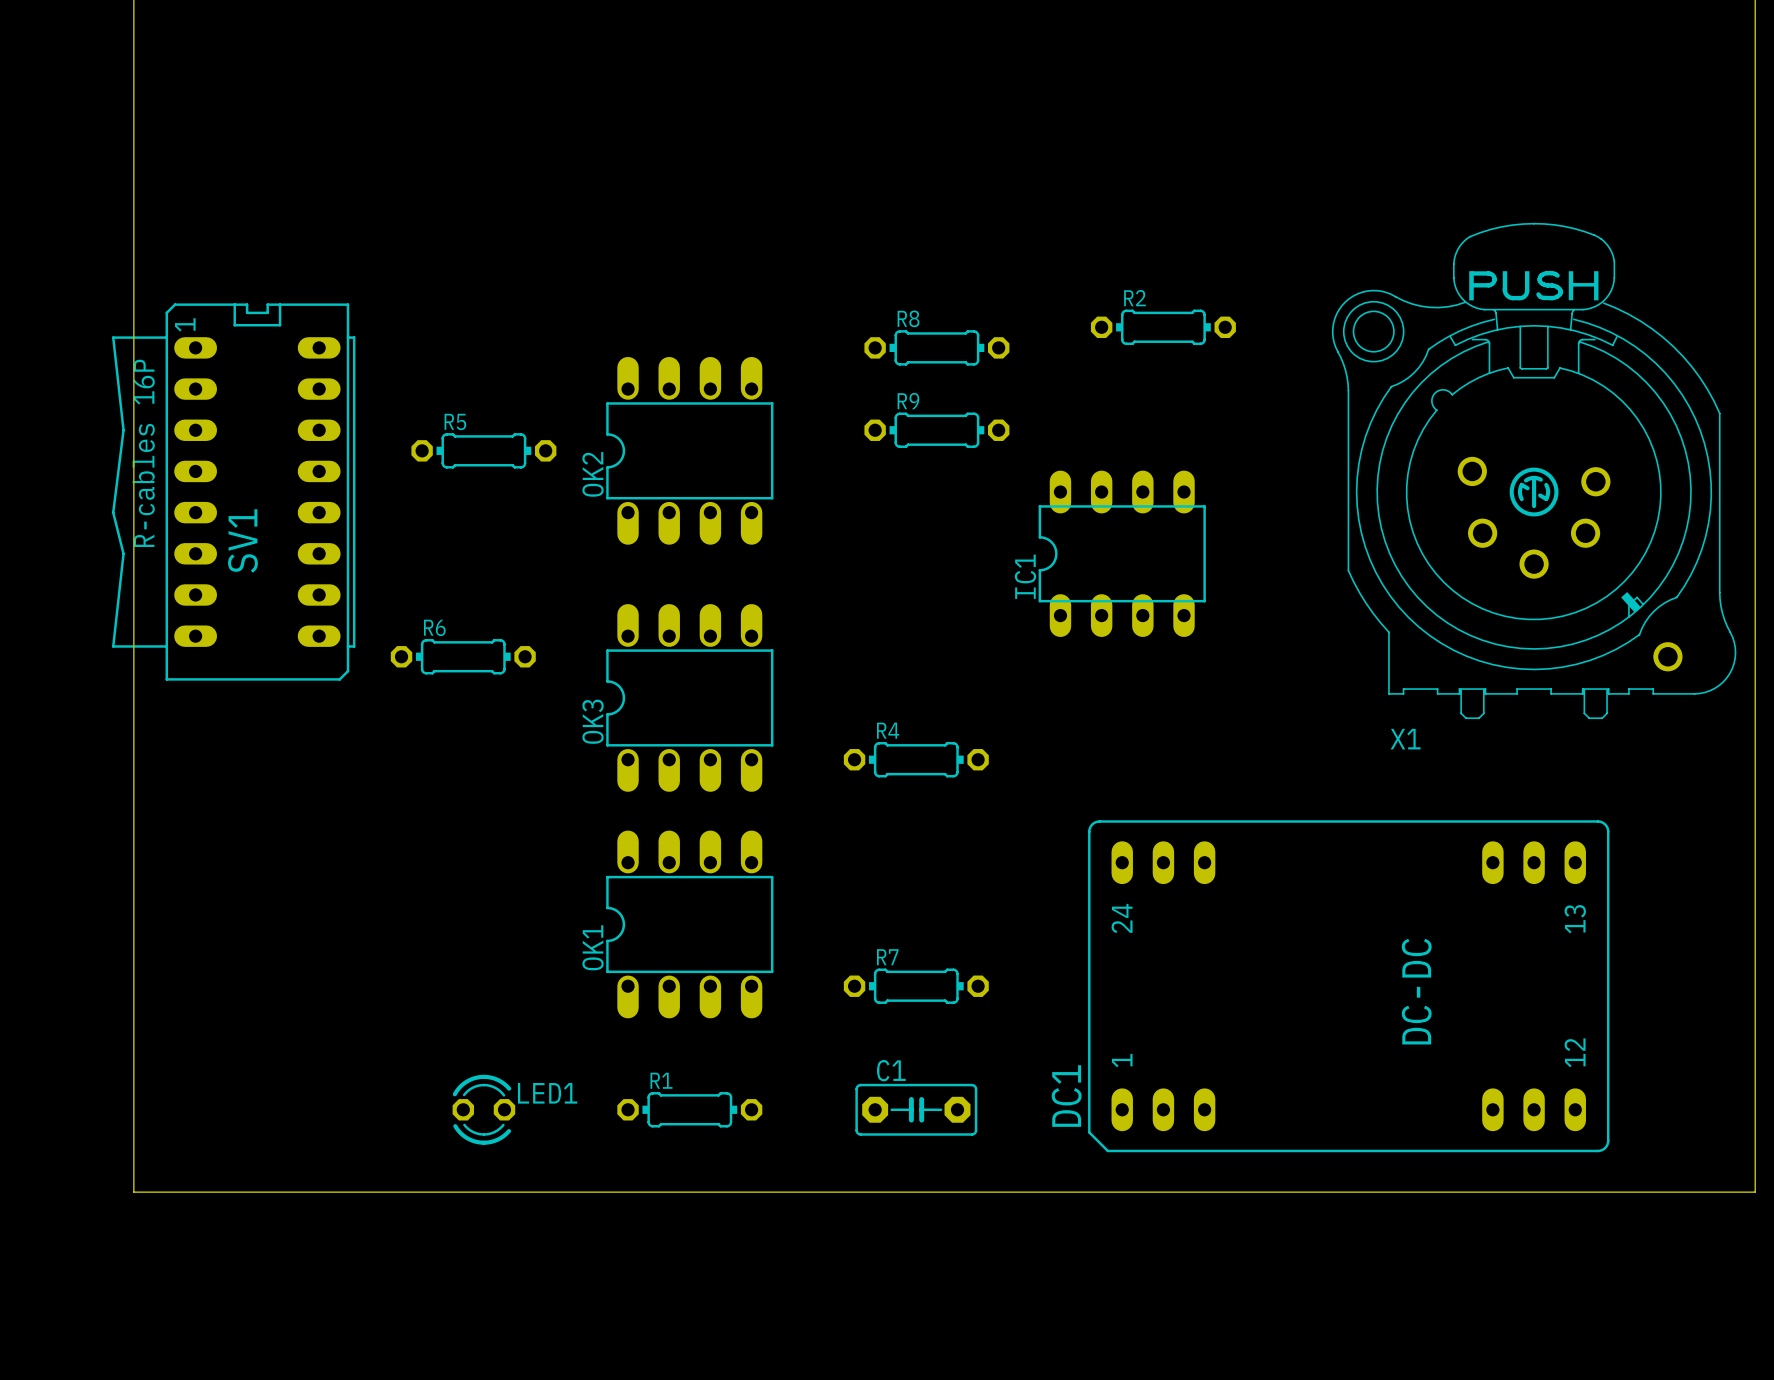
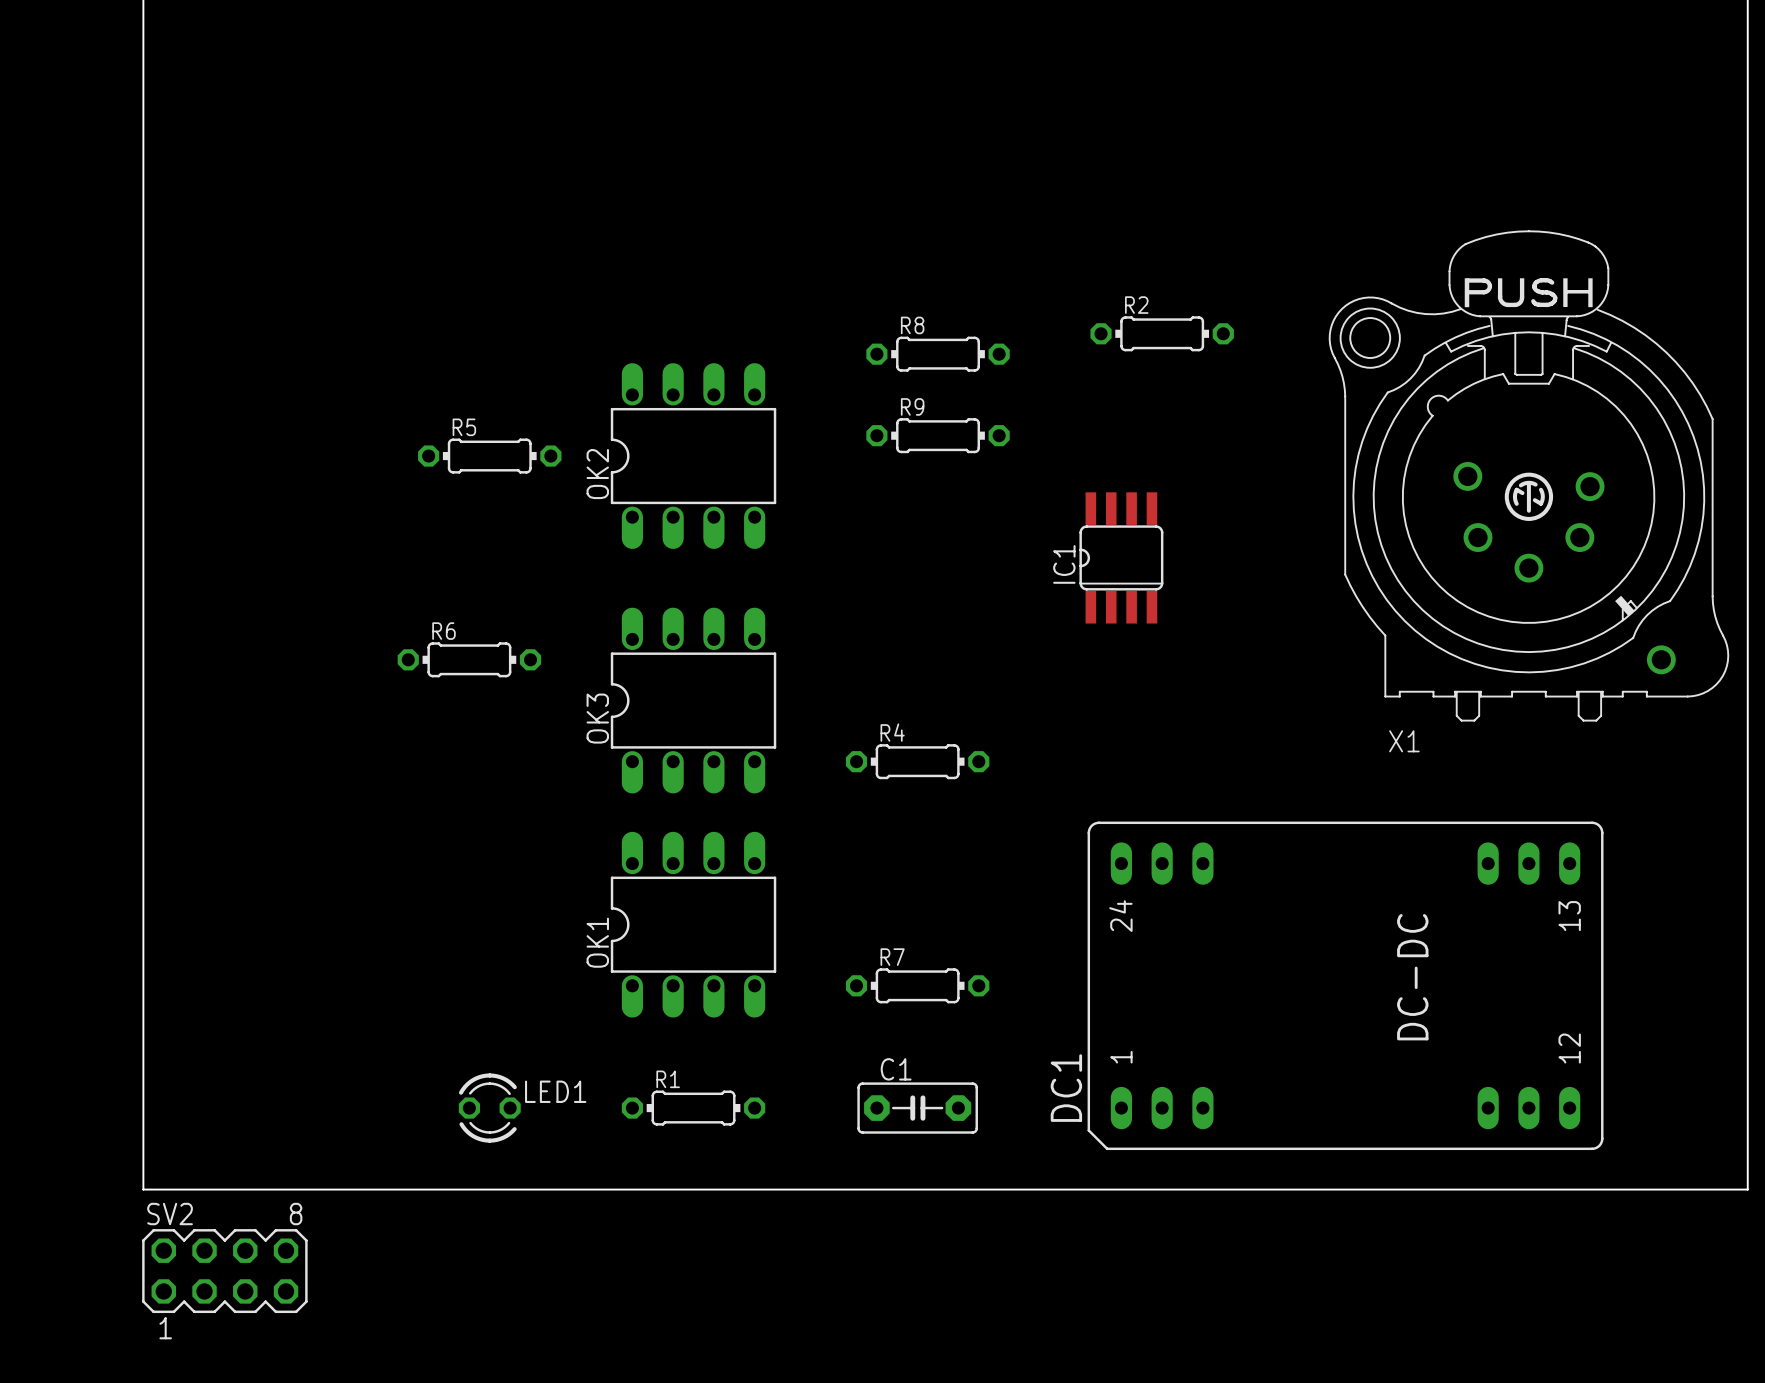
IC1 footprint: [1038, 470, 1206, 638] -> [1079, 492, 1164, 624]
SV1: (233, 492) -> none
IC1 name position: IC1 (1025, 576) -> IC1 (1064, 564)
SV2: none -> (224, 1271)

